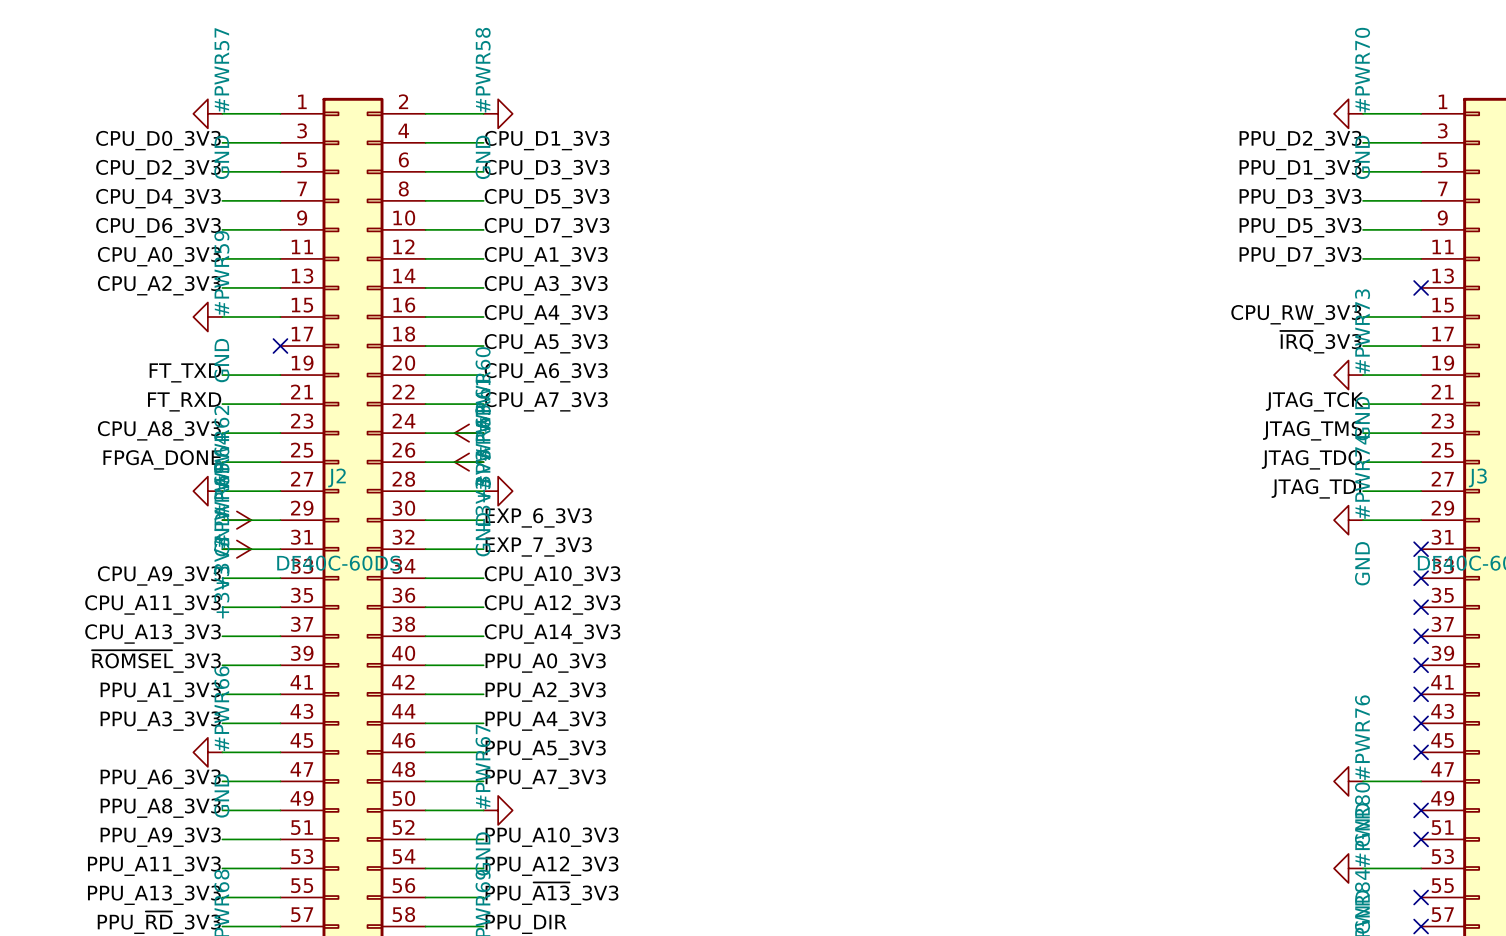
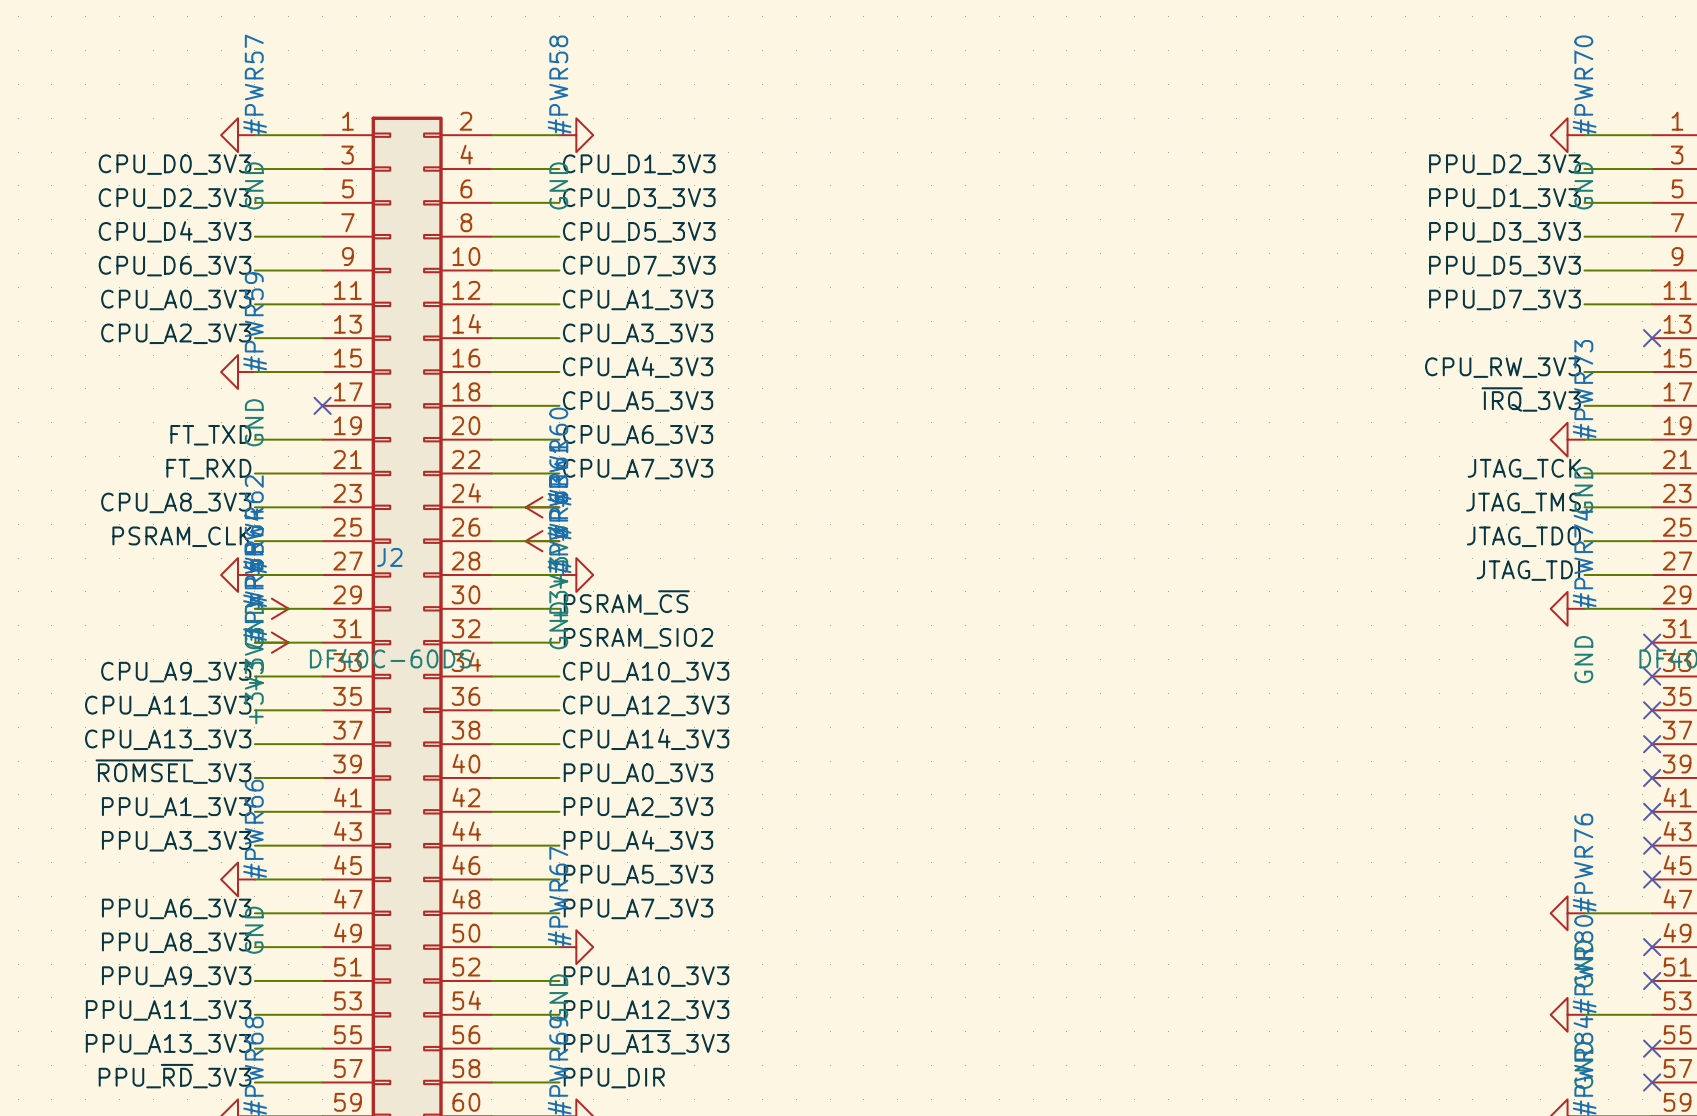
label: FPGA_DONE (162, 459) -> PSRAM_CLK (181, 536)
label: EXP_6_3V3 (538, 517) -> PSRAM_~{CS} (626, 602)
label: EXP_7_3V3 (538, 546) -> PSRAM_SIO2 (638, 638)

